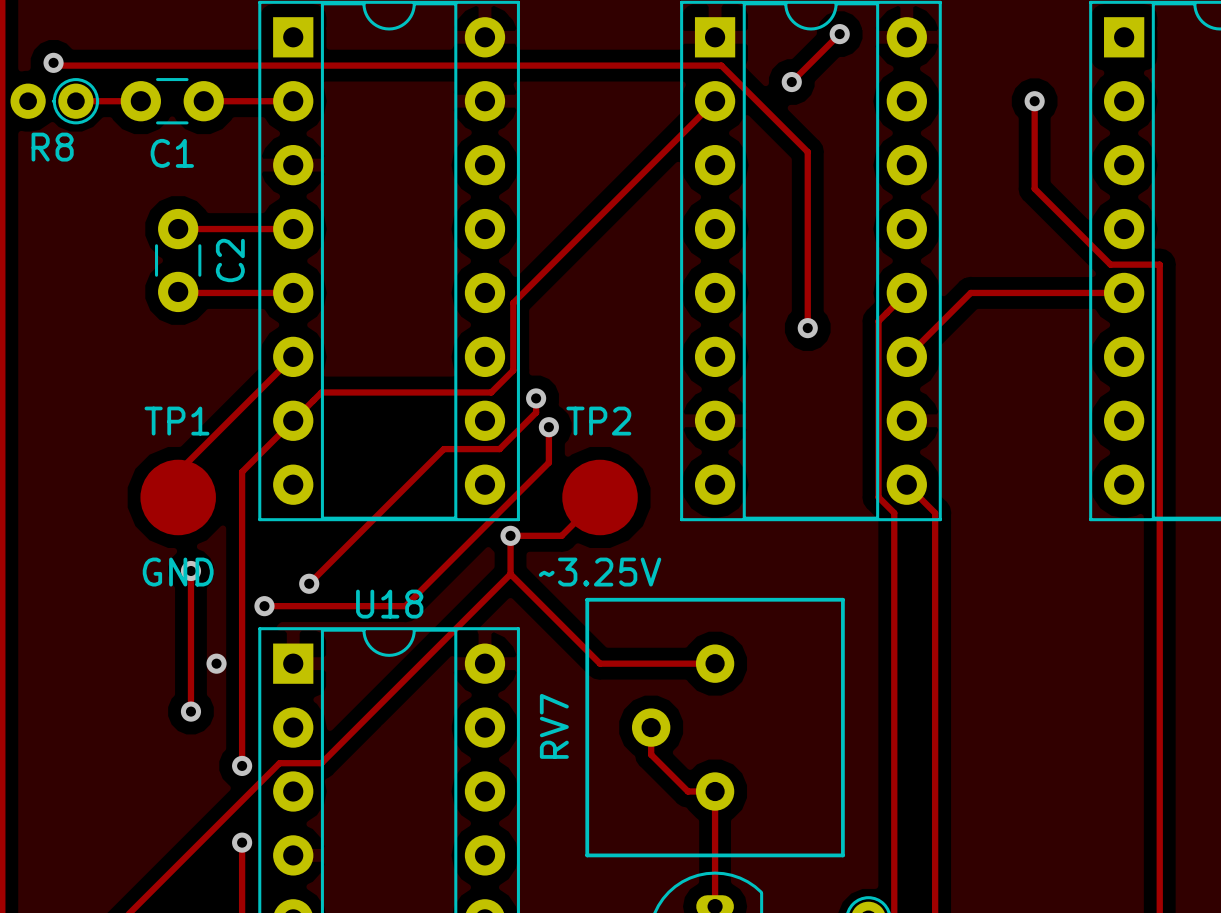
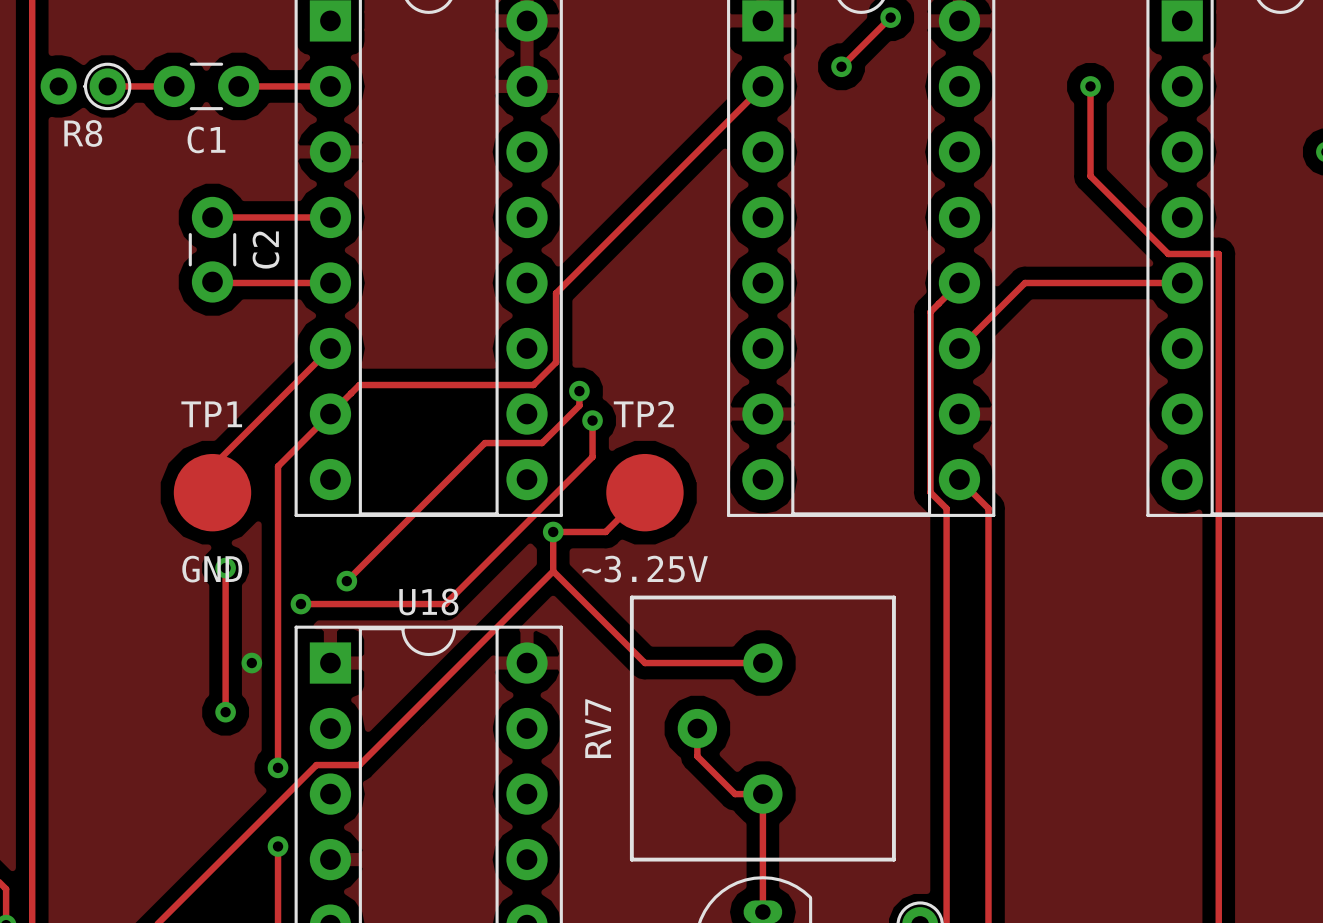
track: (53, 62) (56, 65) (721, 65) (807, 151) (807, 328) -> none
via: (53, 62) -> none
via: (807, 328) -> none

